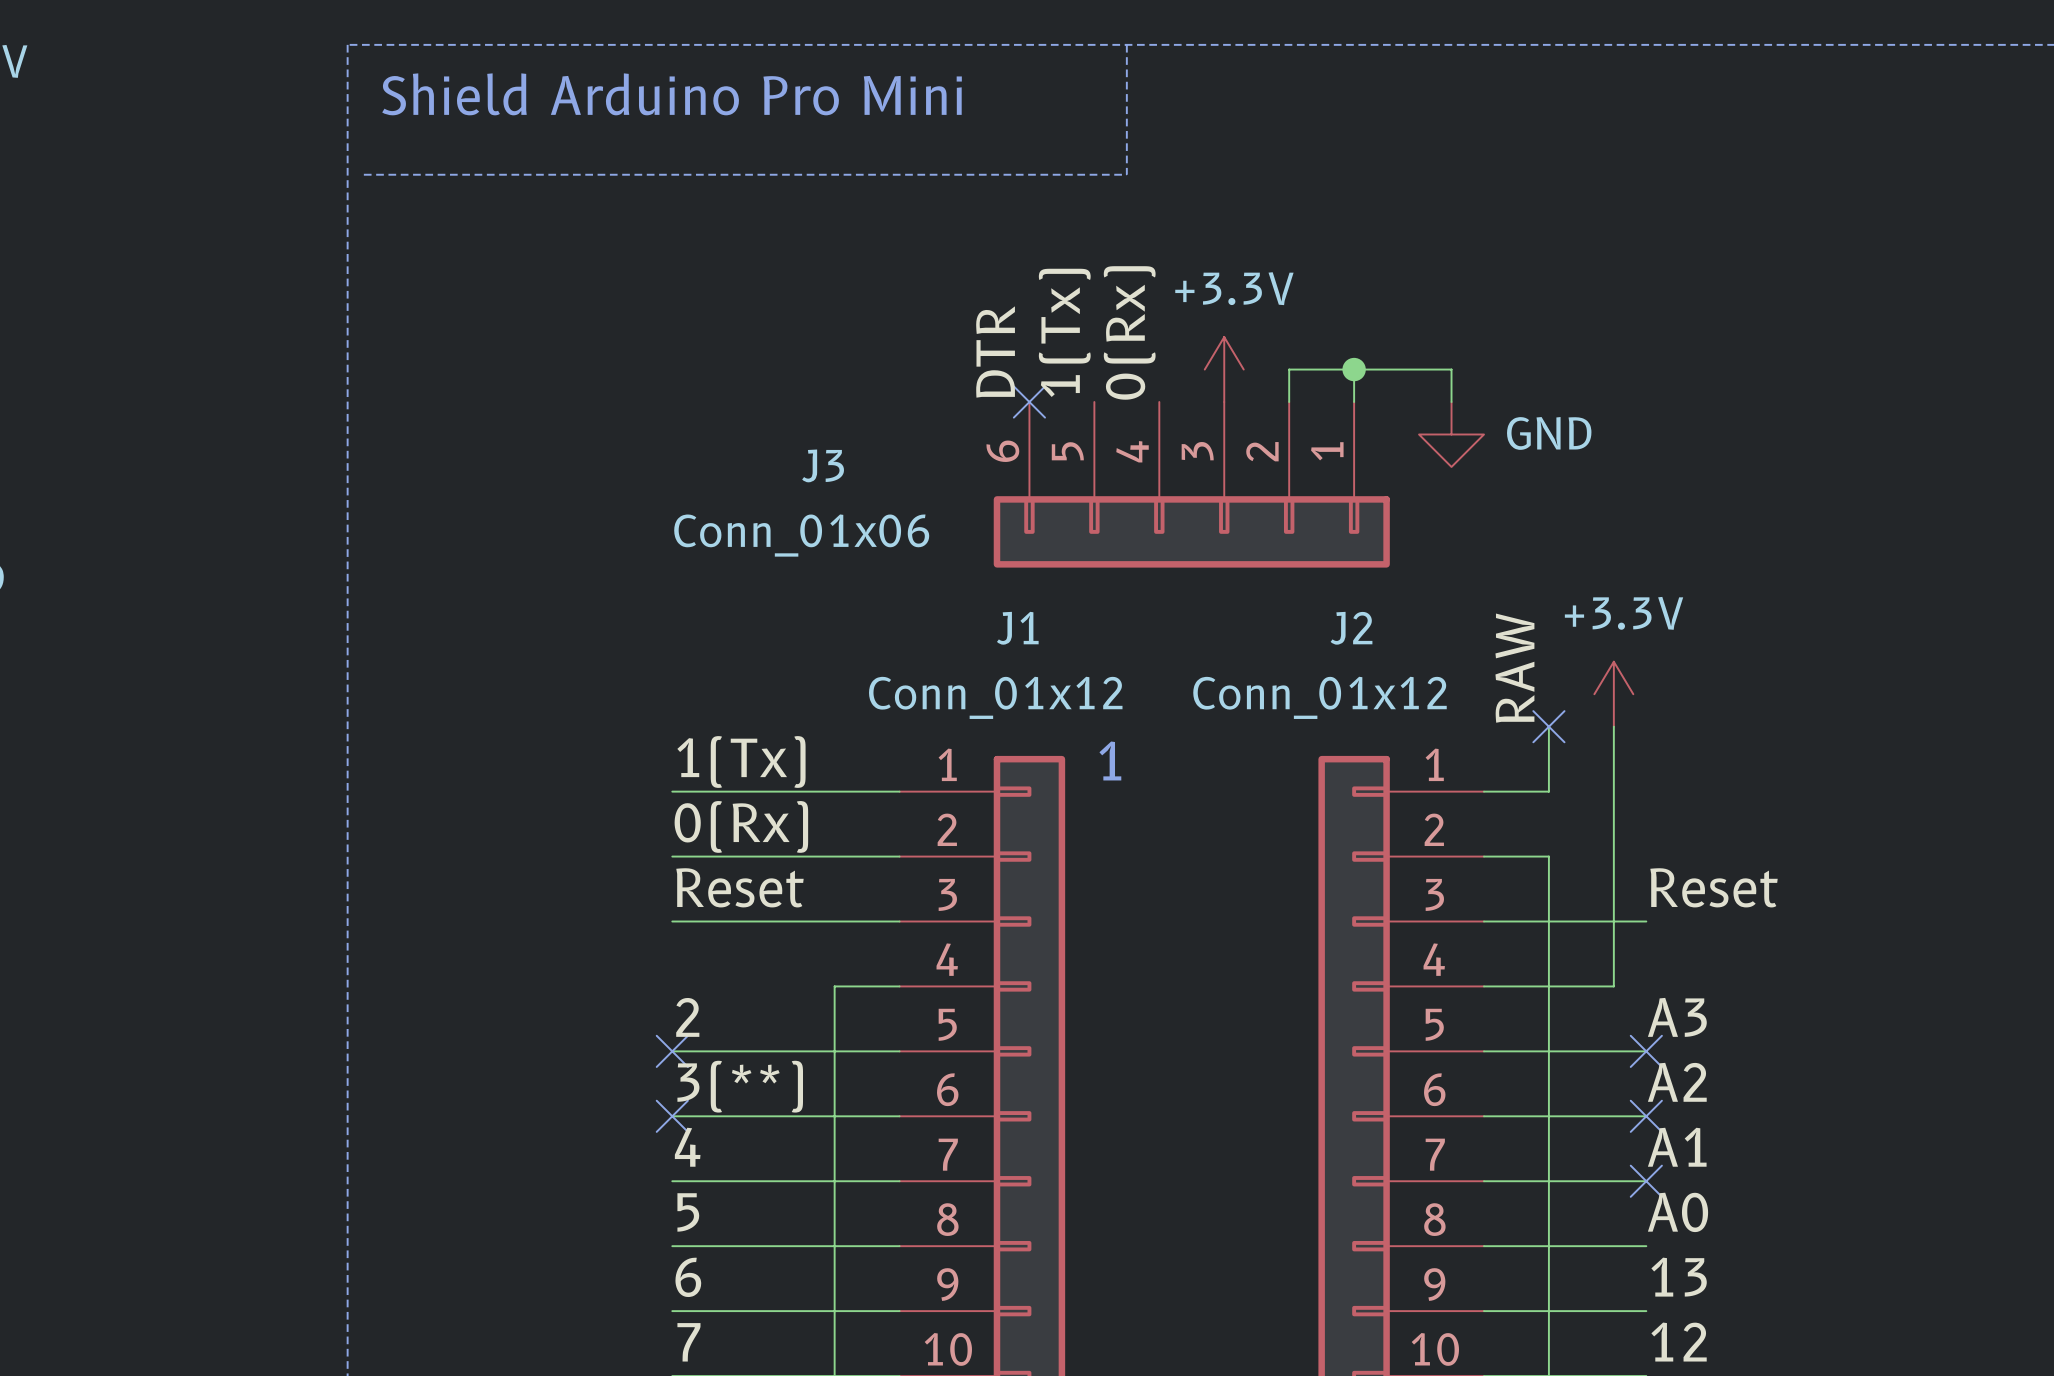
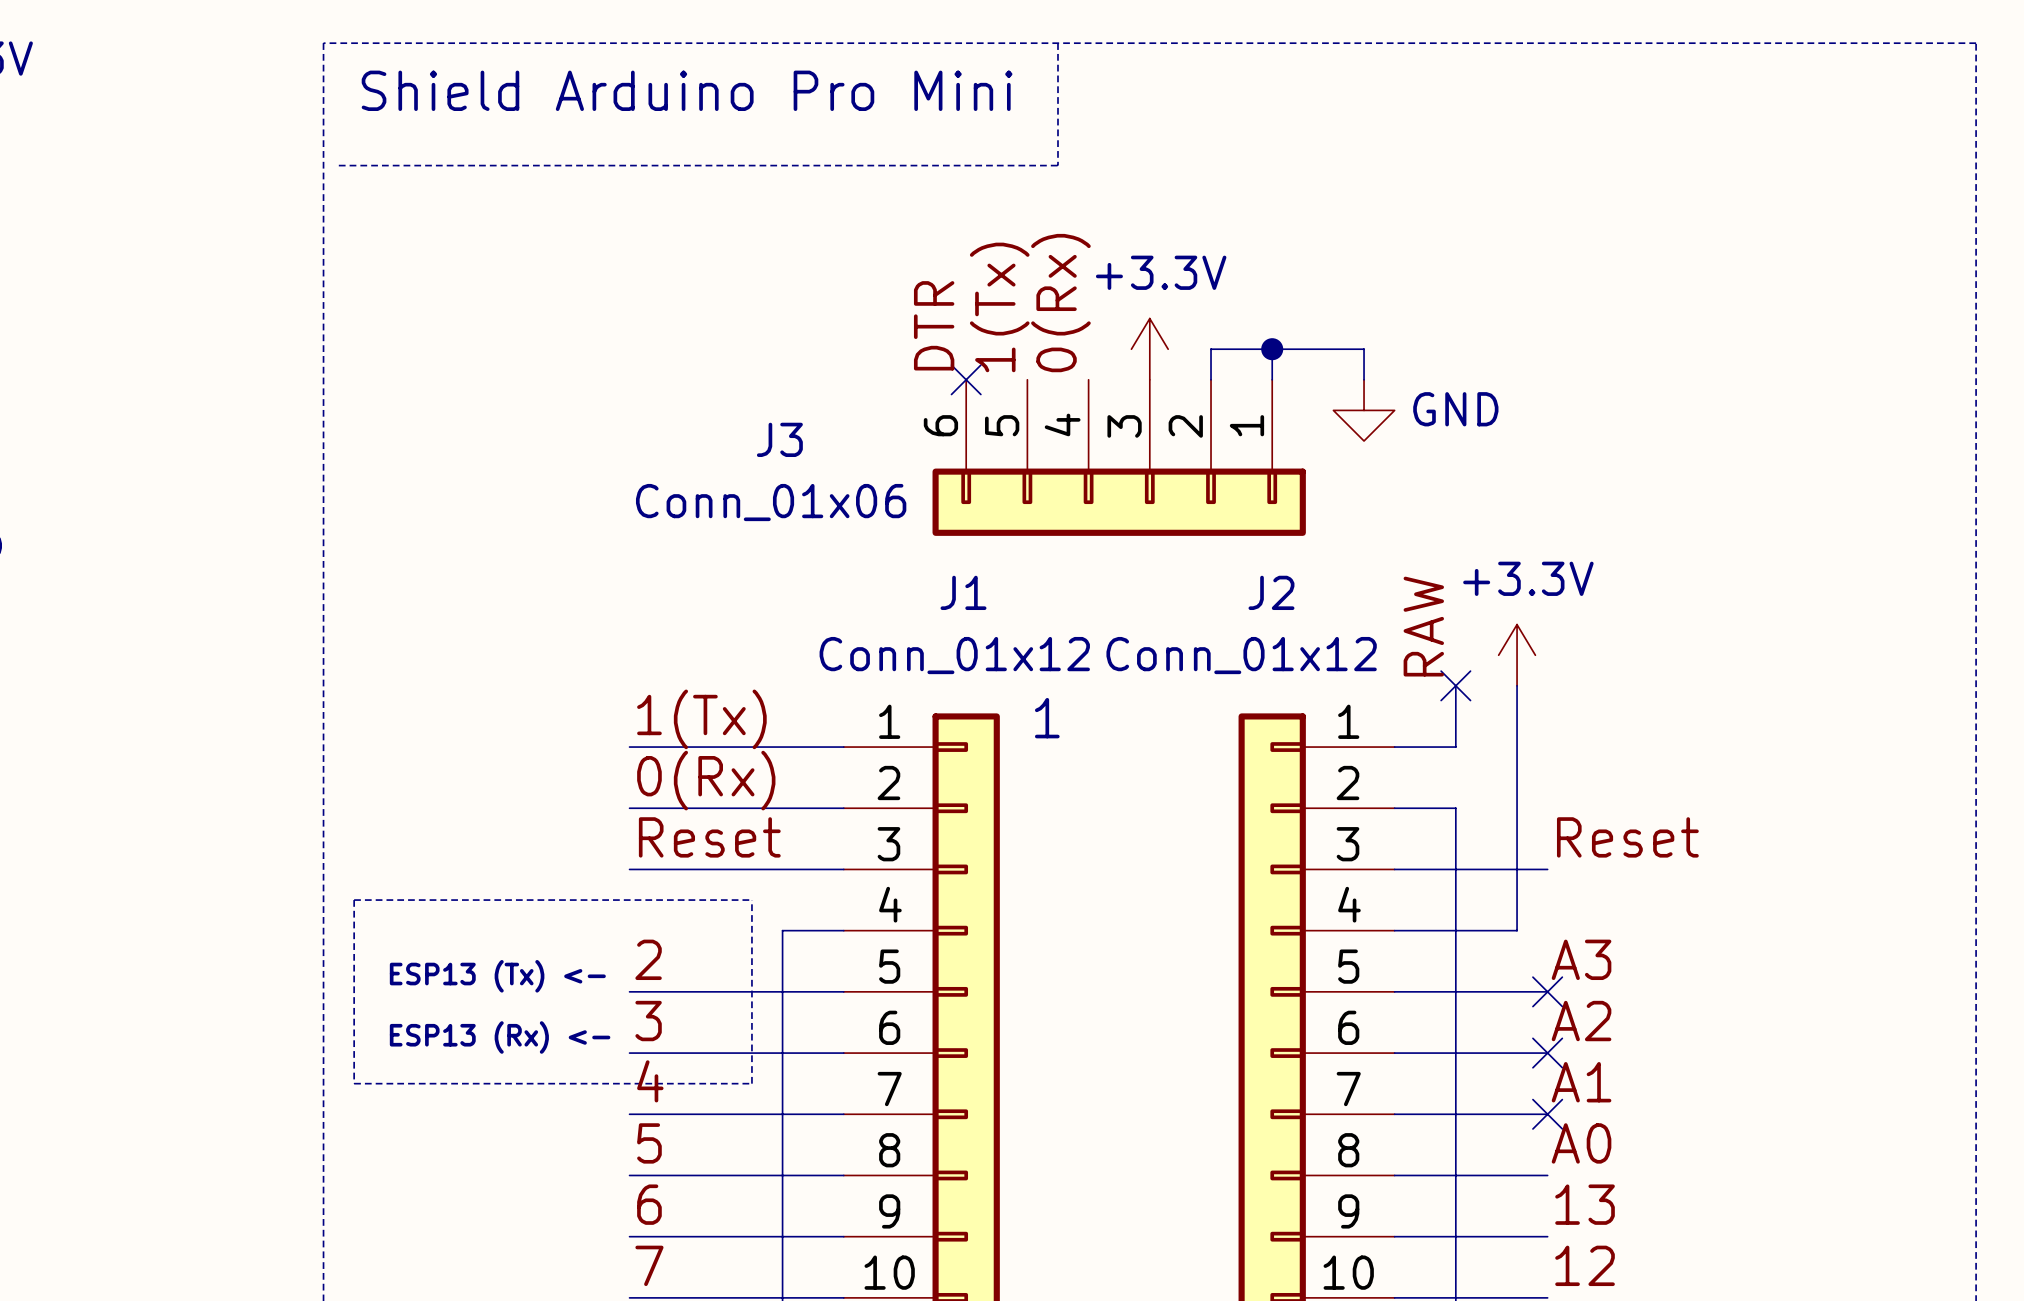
line: none -> (354, 900) (354, 1083) (751, 1083) (751, 900) (354, 900)
text: none -> ESP13 (Tx) <- (497, 976)
no-connect mark: (672, 1051) -> none
label: 3(**) (740, 1086) -> 3 (648, 1021)
text: none -> ESP13 (Rx) <- (500, 1037)
no-connect mark: (672, 1116) -> none

